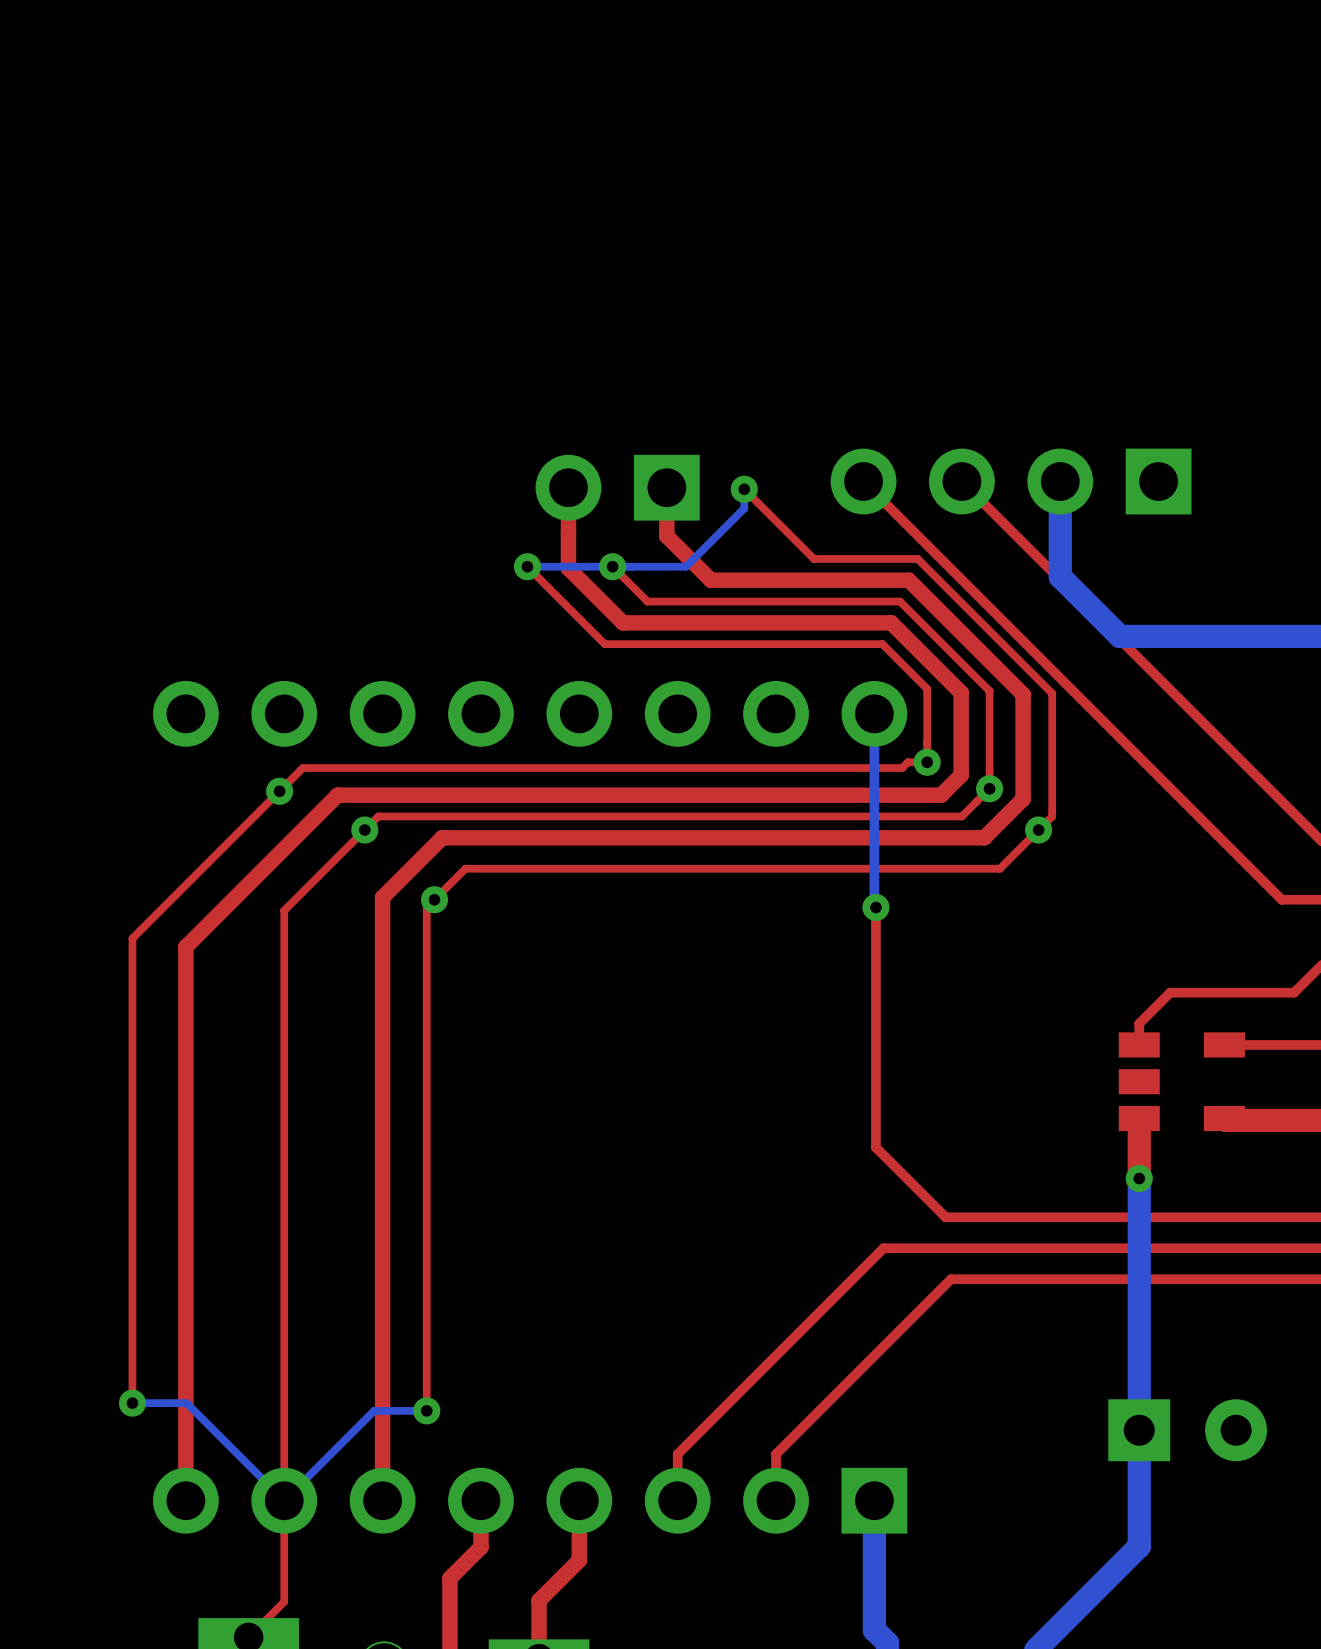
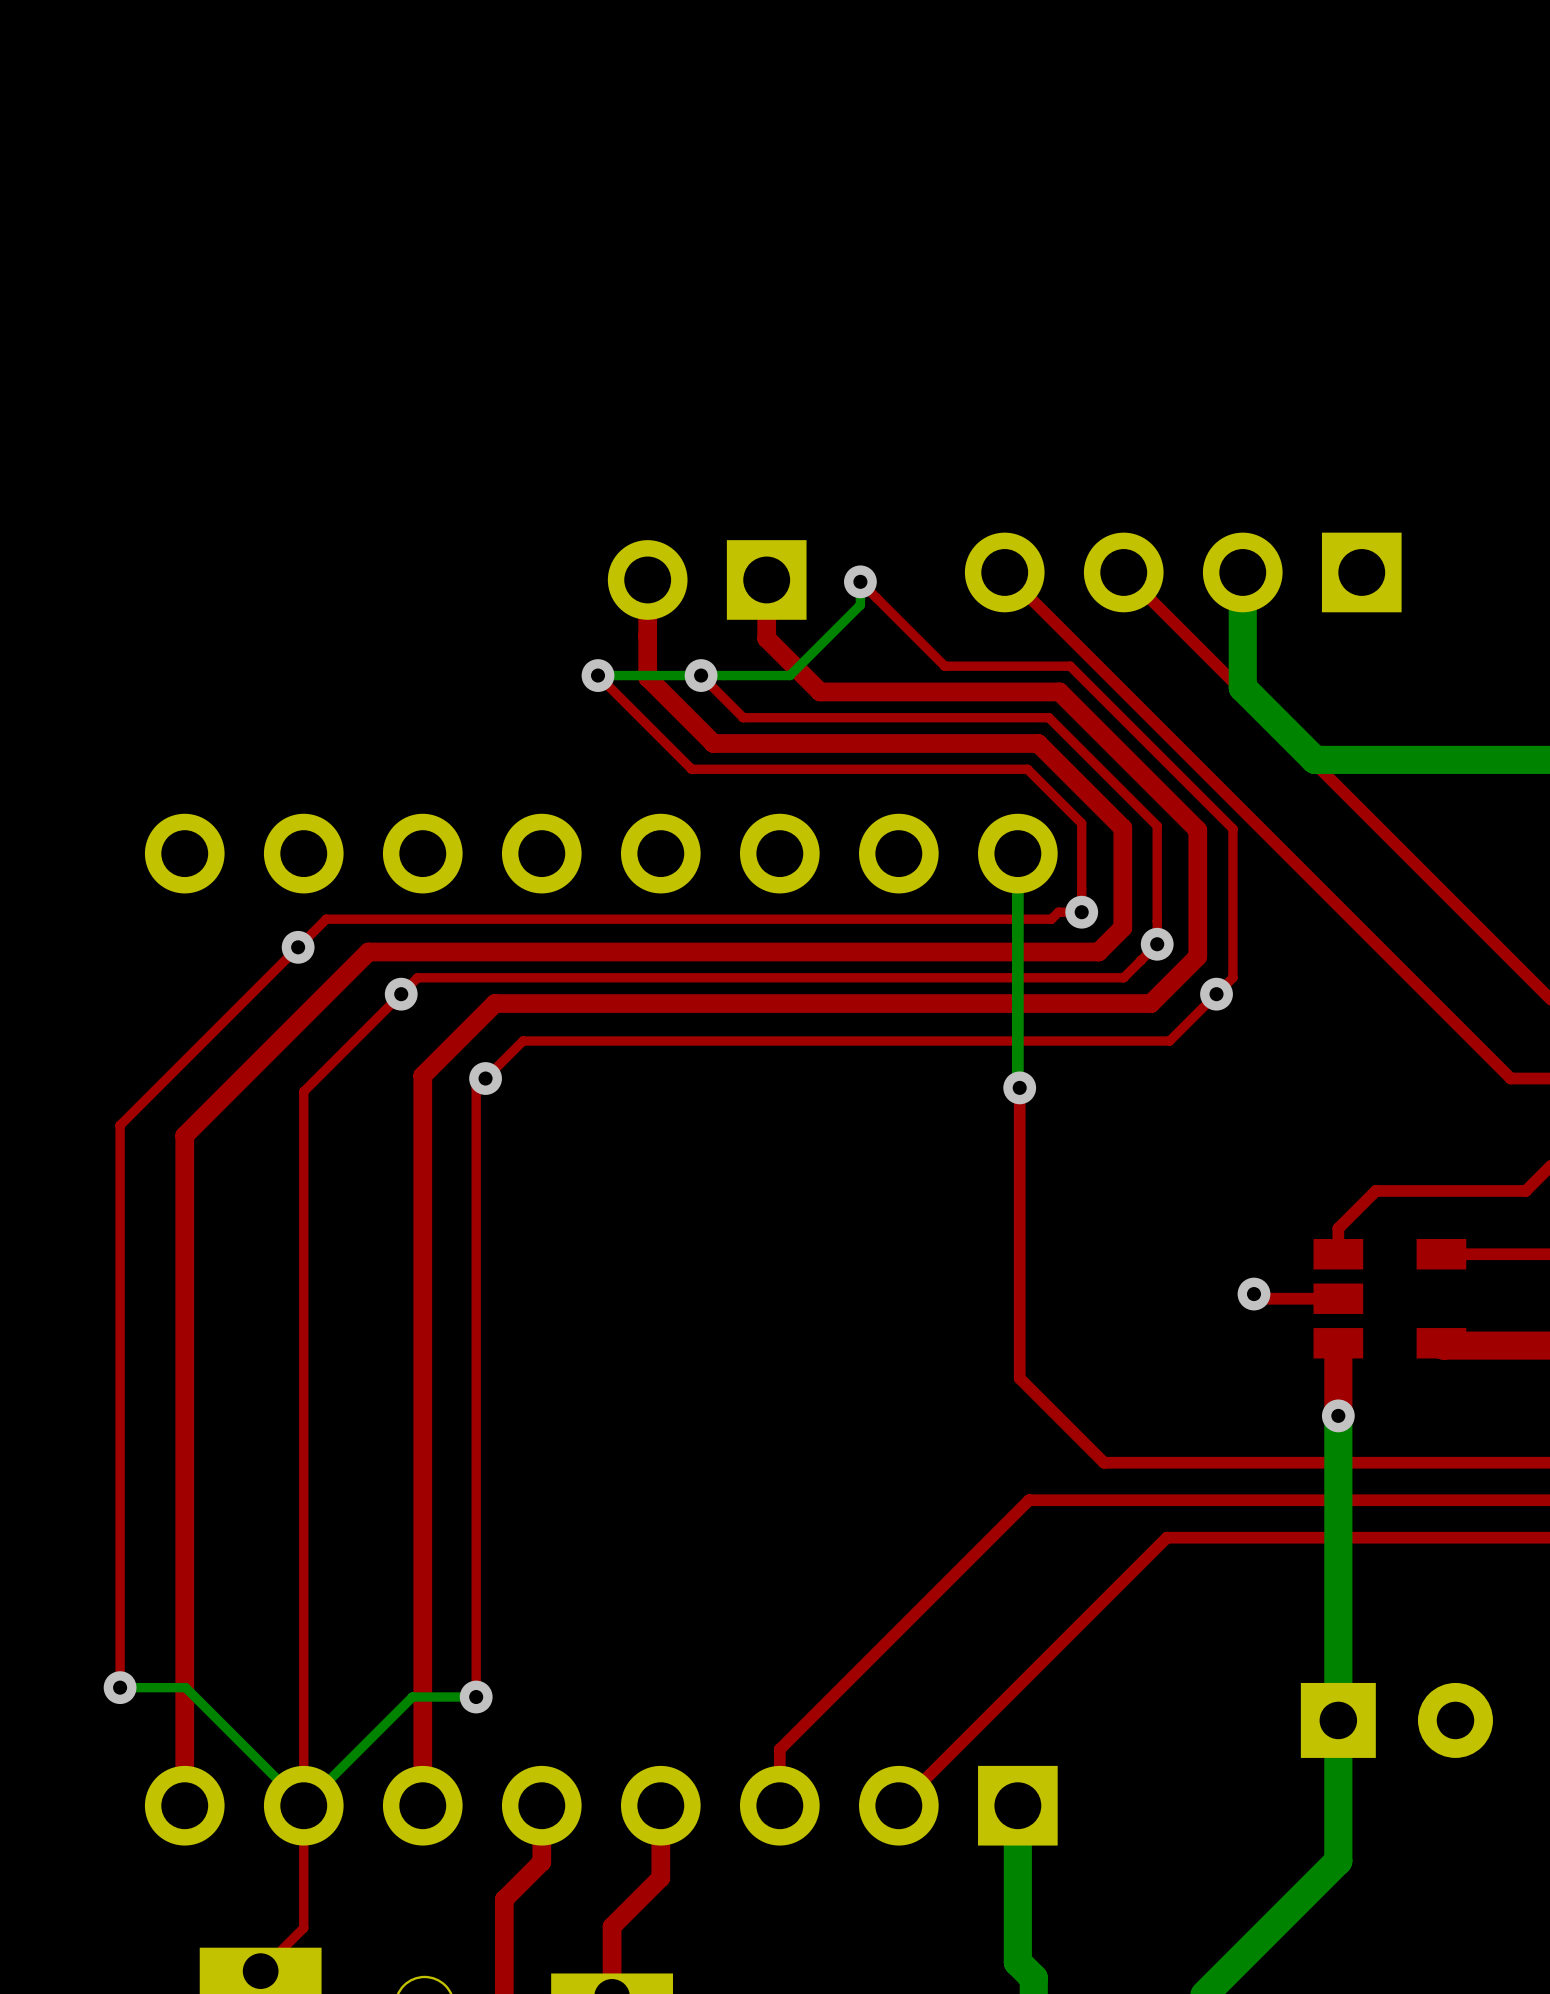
top track: none -> (1254, 1294) (1258, 1298) (1338, 1298)
via: none -> (1254, 1294)
top track: (997, 1279) (950, 1279) (776, 1454) (776, 1500) -> (1166, 1537) (898, 1805)

